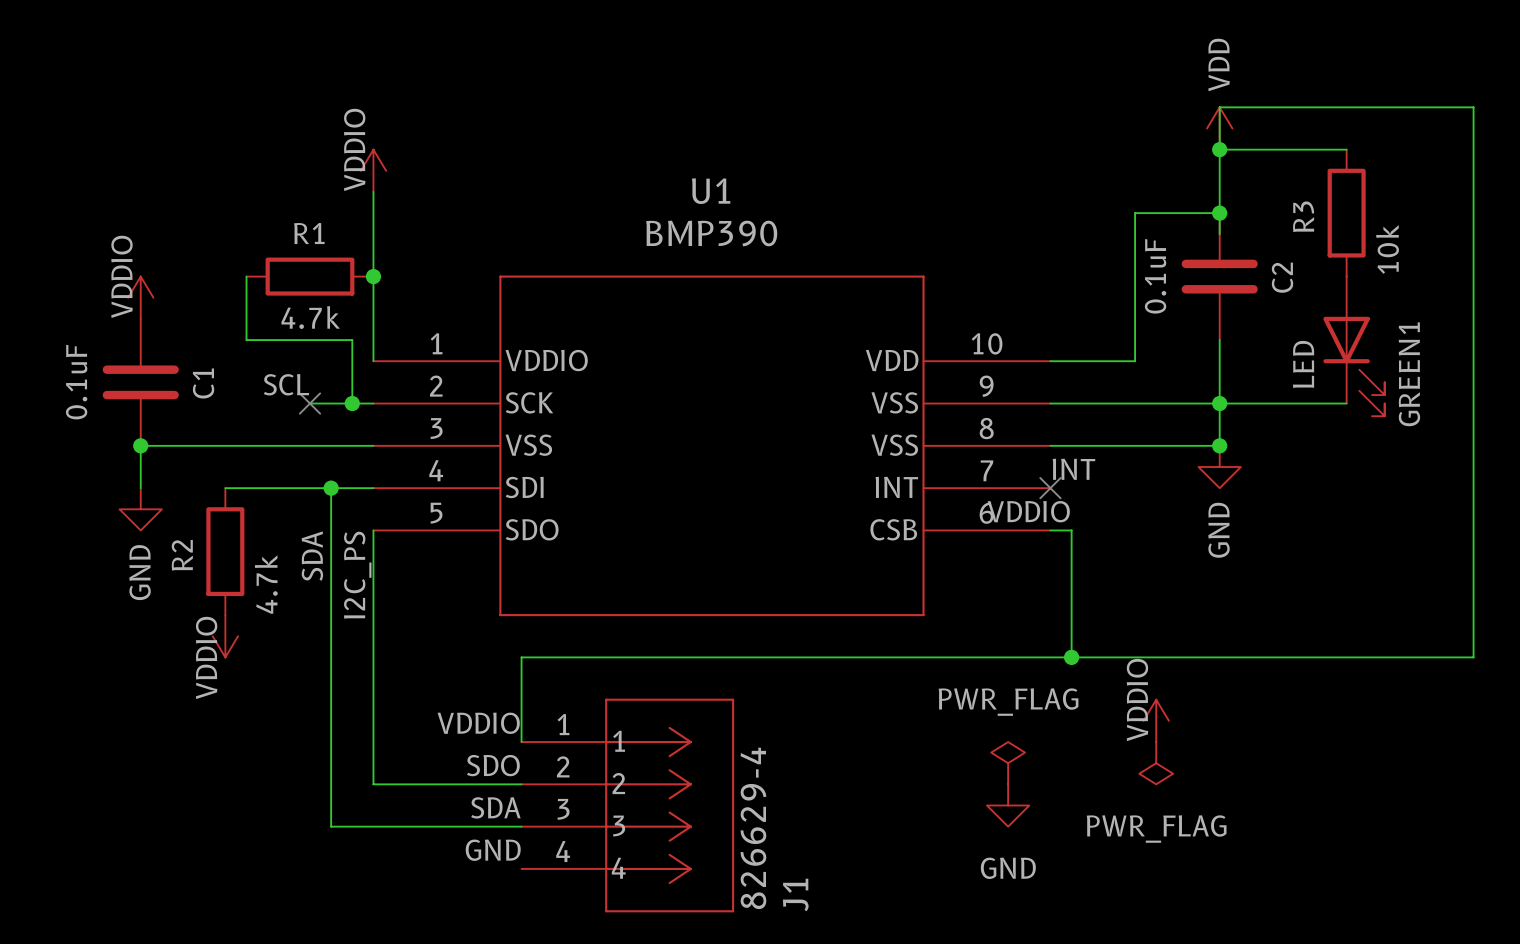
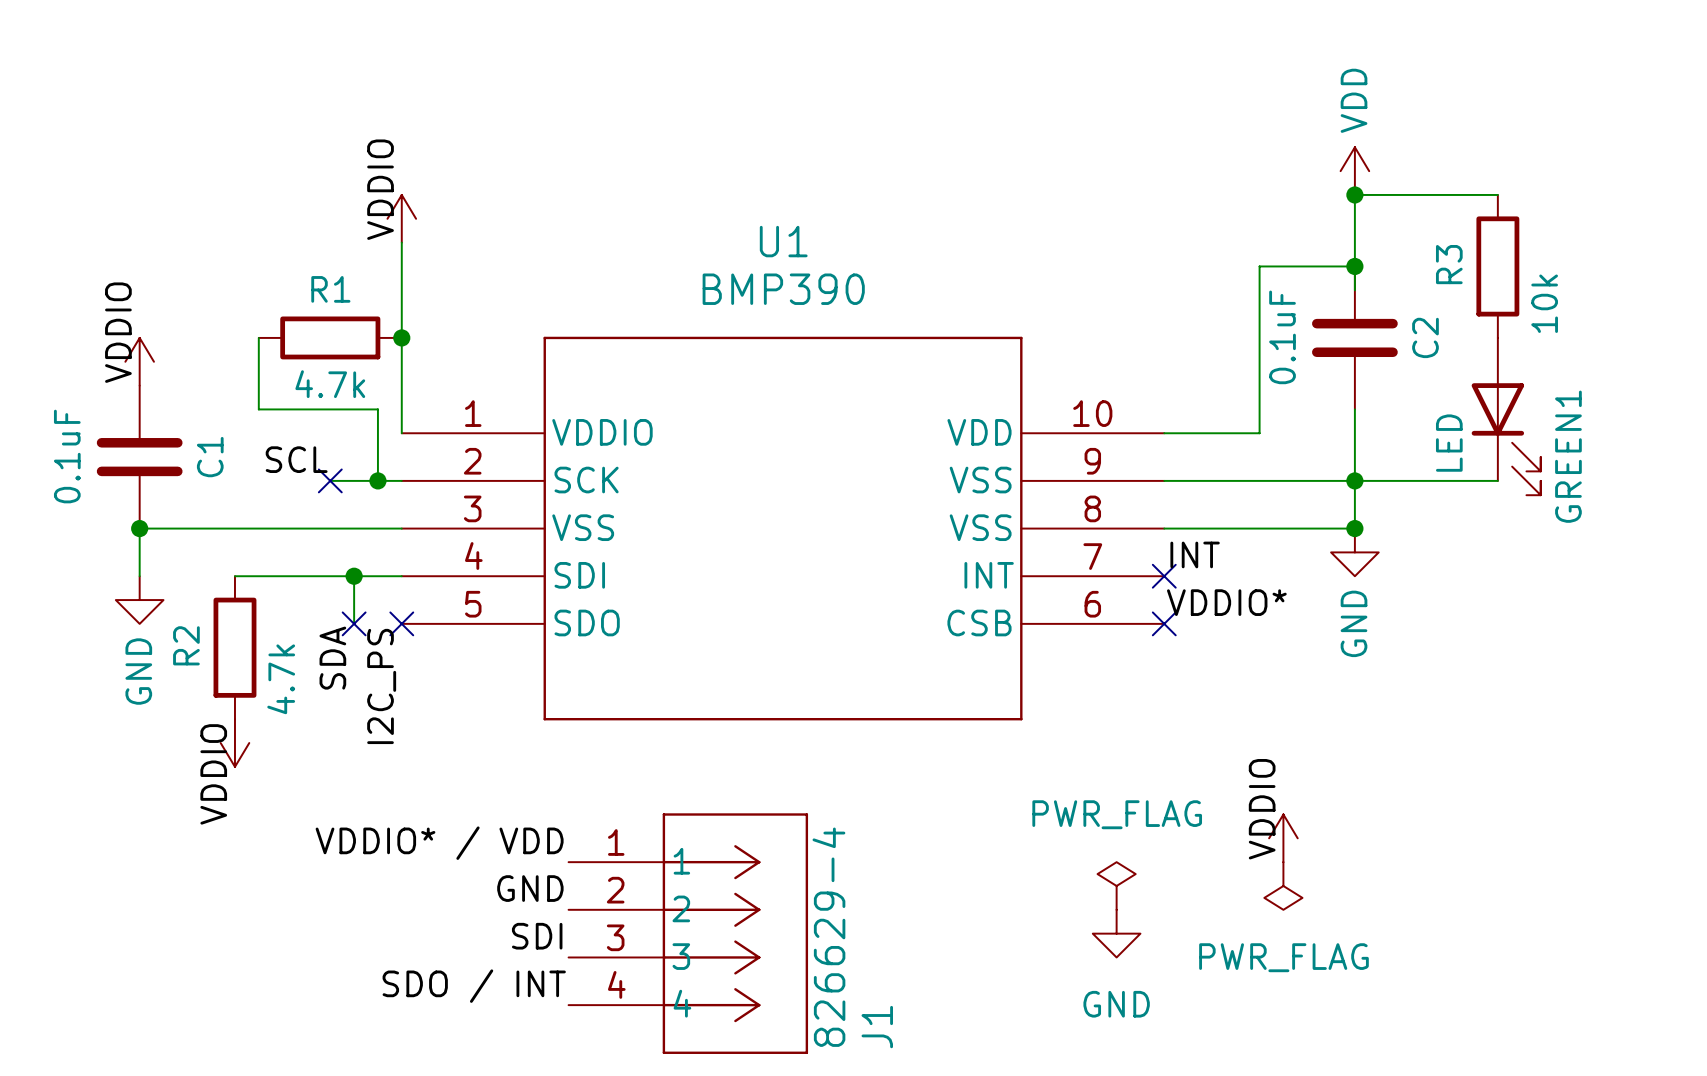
wire: (1219, 149) (1219, 107) (1473, 107) (1473, 657) (521, 657) (521, 742) -> none
label: VDDIO (1028, 511) -> VDDIO* (1226, 602)
wire: (331, 530) (331, 826) (521, 826) -> none
no-connect mark: none -> (354, 623)
wire: (373, 530) (373, 784) (521, 784) -> none
no-connect mark: none -> (401, 623)
wire: (1050, 530) (1071, 530) (1071, 657) -> none
no-connect mark: none -> (1164, 623)
junction: (1071, 657) -> none
label: VDDIO (478, 723) -> VDDIO* / VDD (439, 843)
label: SDO (493, 765) -> GND (530, 888)
label: SDA (495, 807) -> SDI (537, 936)
label: GND (493, 850) -> SDO / INT (474, 986)

